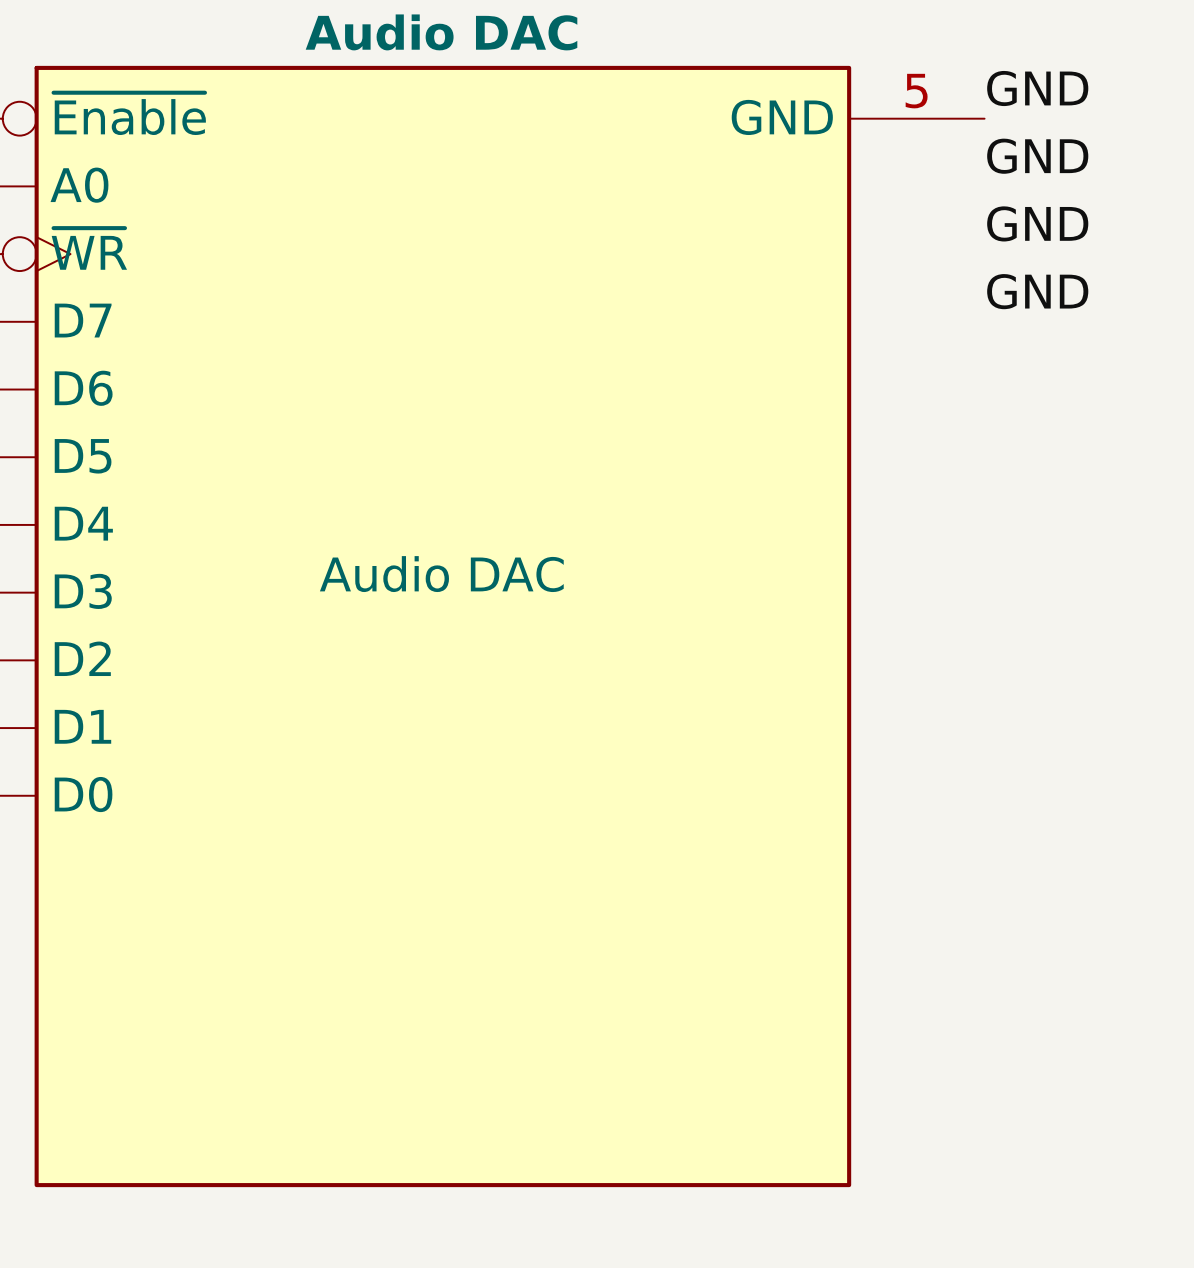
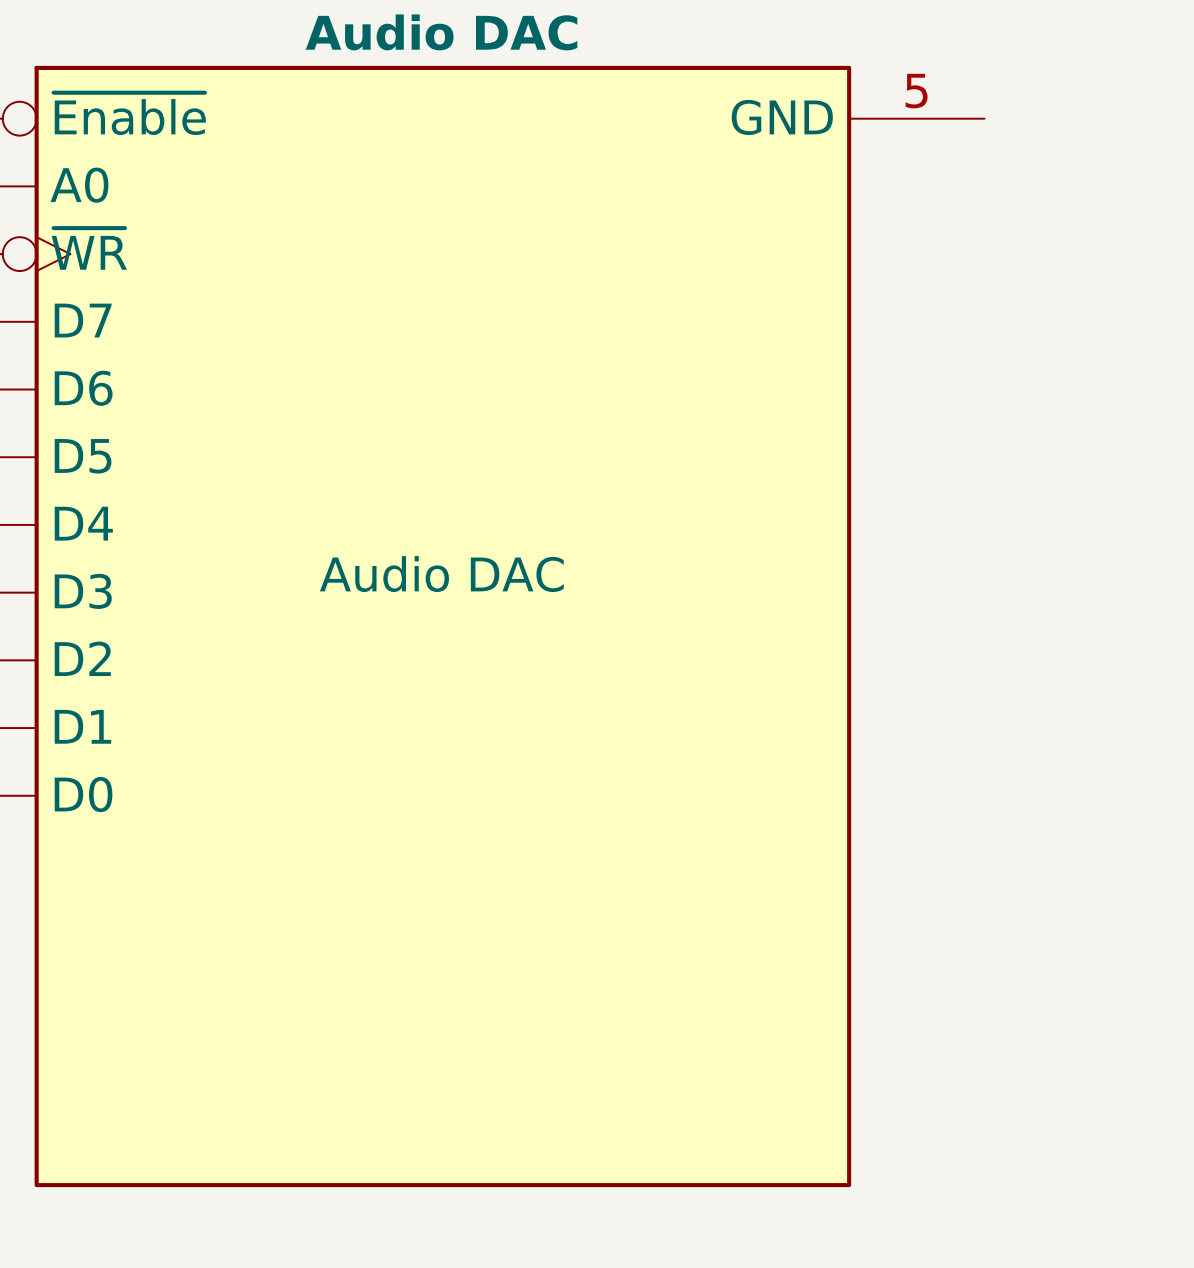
label: GND (1037, 88) -> none
label: GND (1037, 156) -> none
label: GND (1037, 223) -> none
label: GND (1037, 291) -> none

